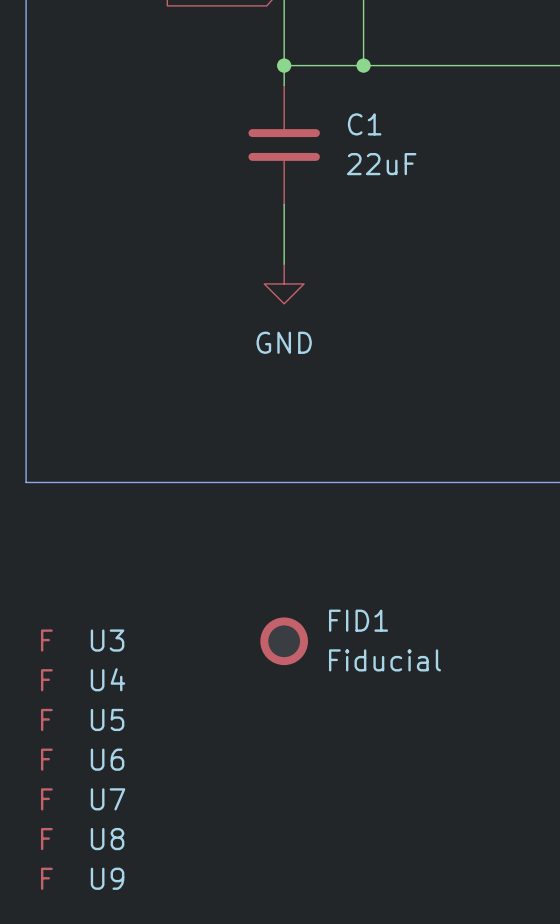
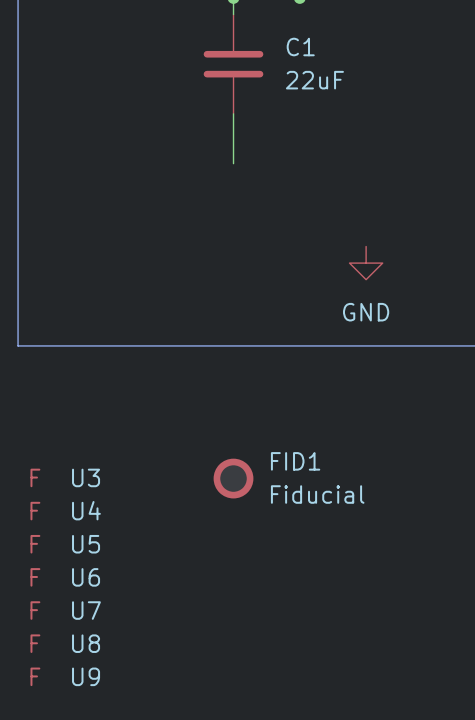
power symbol position: GND (284, 283) -> GND (366, 263)

